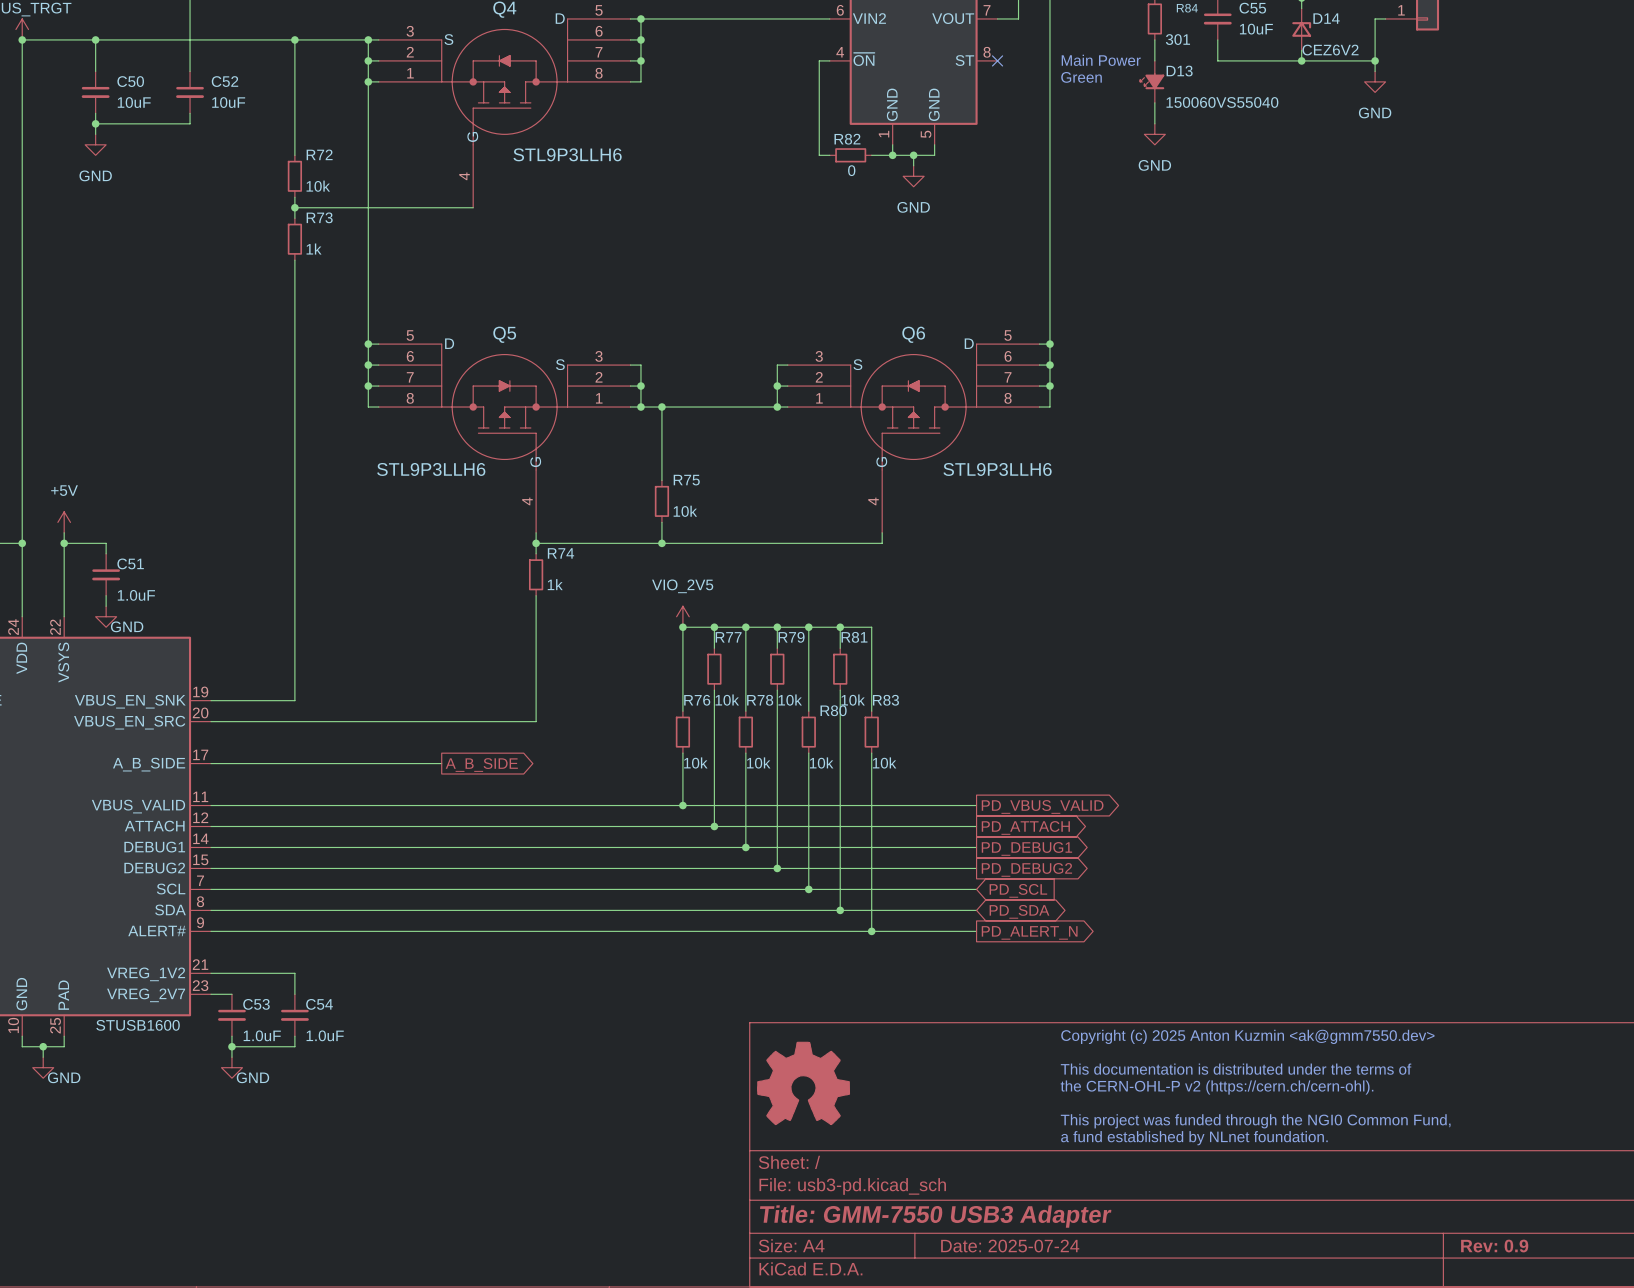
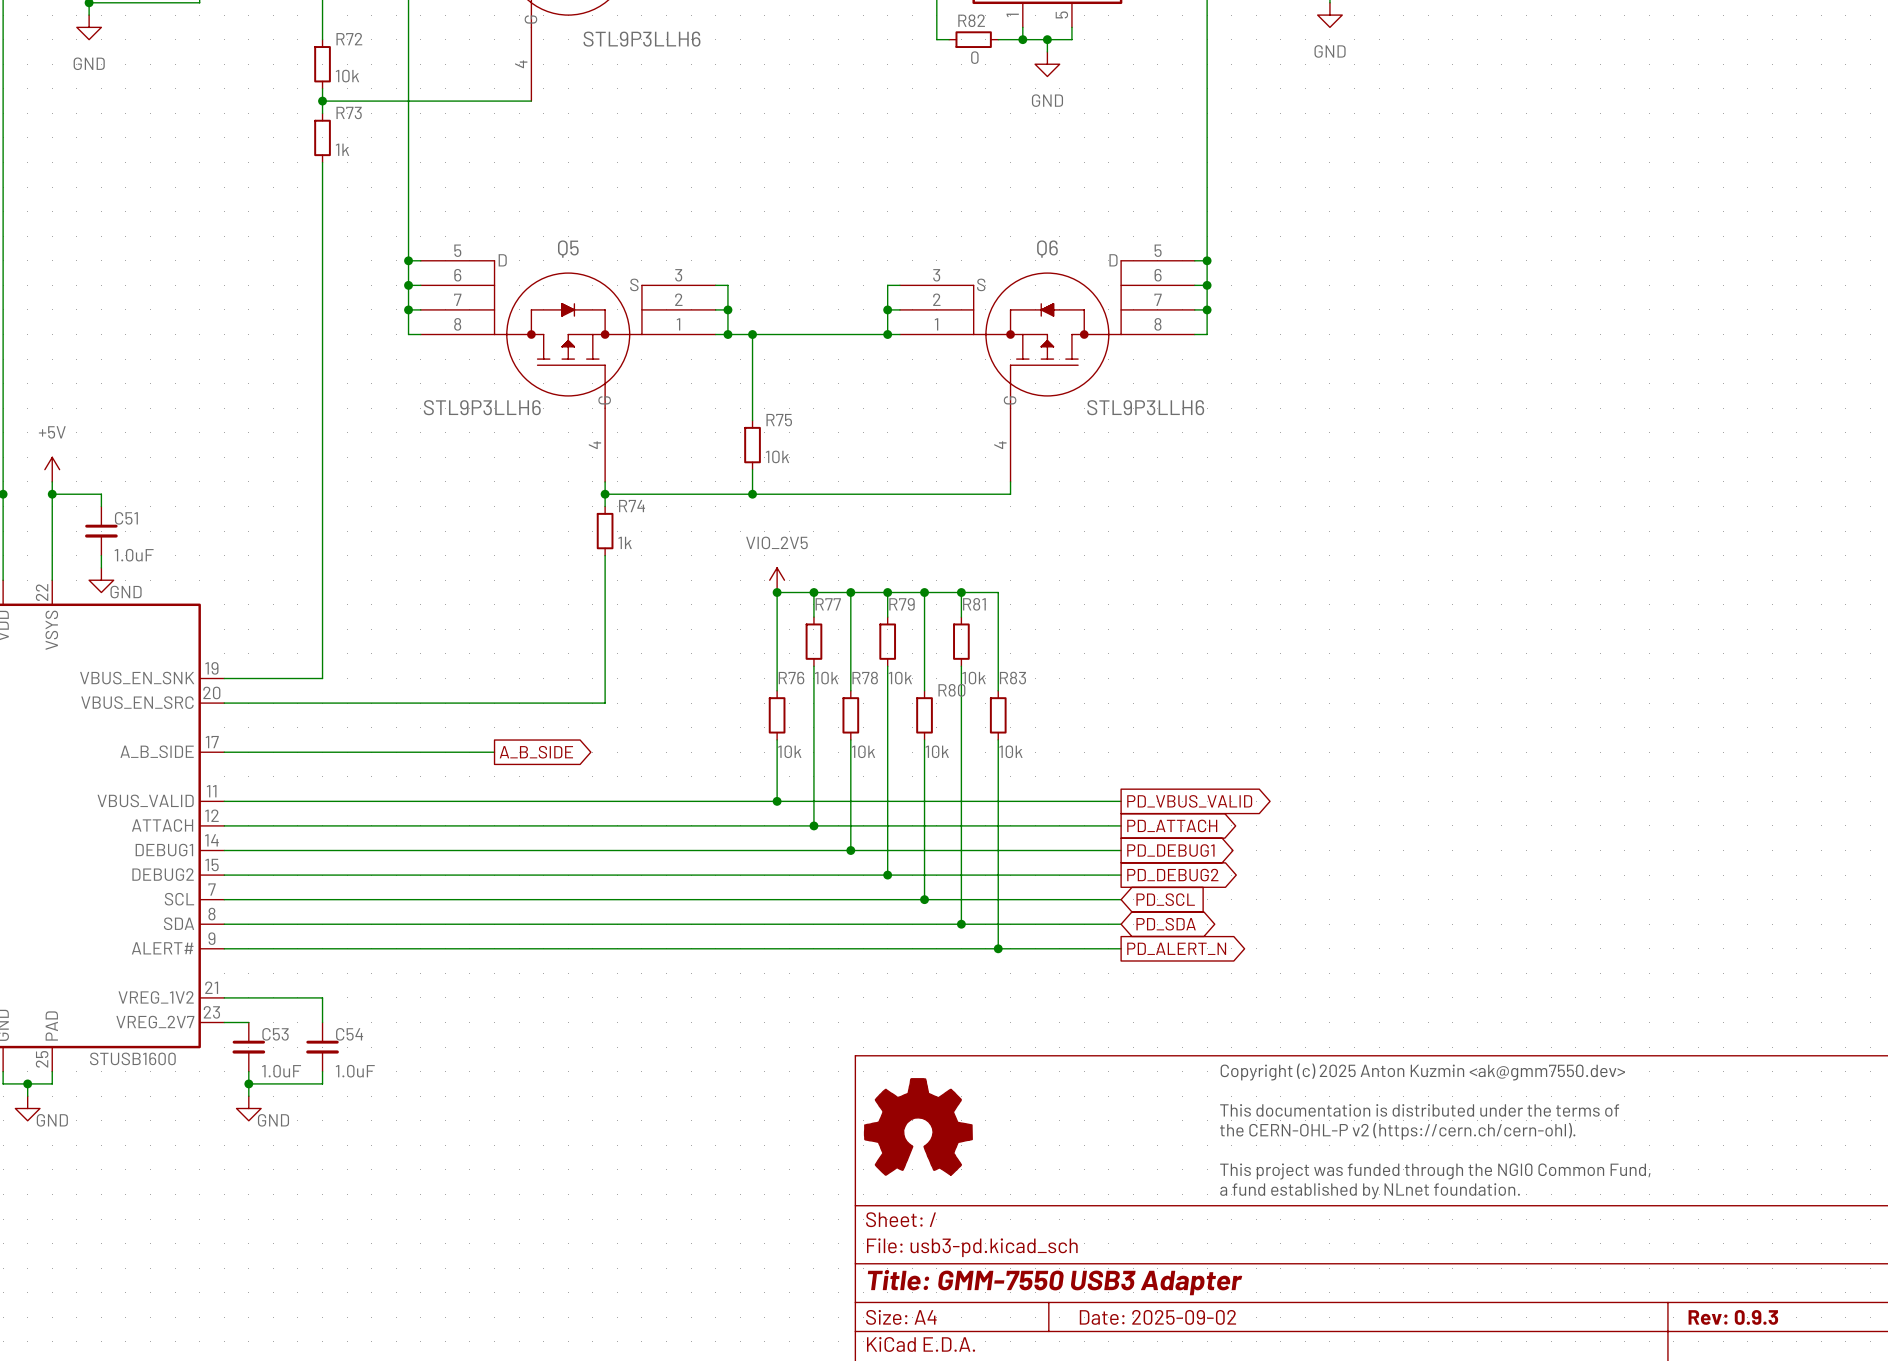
title block: Date: 2025-07-24 (1010, 1246) -> Date: 2025-09-02 (1157, 1317)
title block: Rev: 0.9 (1494, 1246) -> Rev: 0.9.3 (1733, 1317)

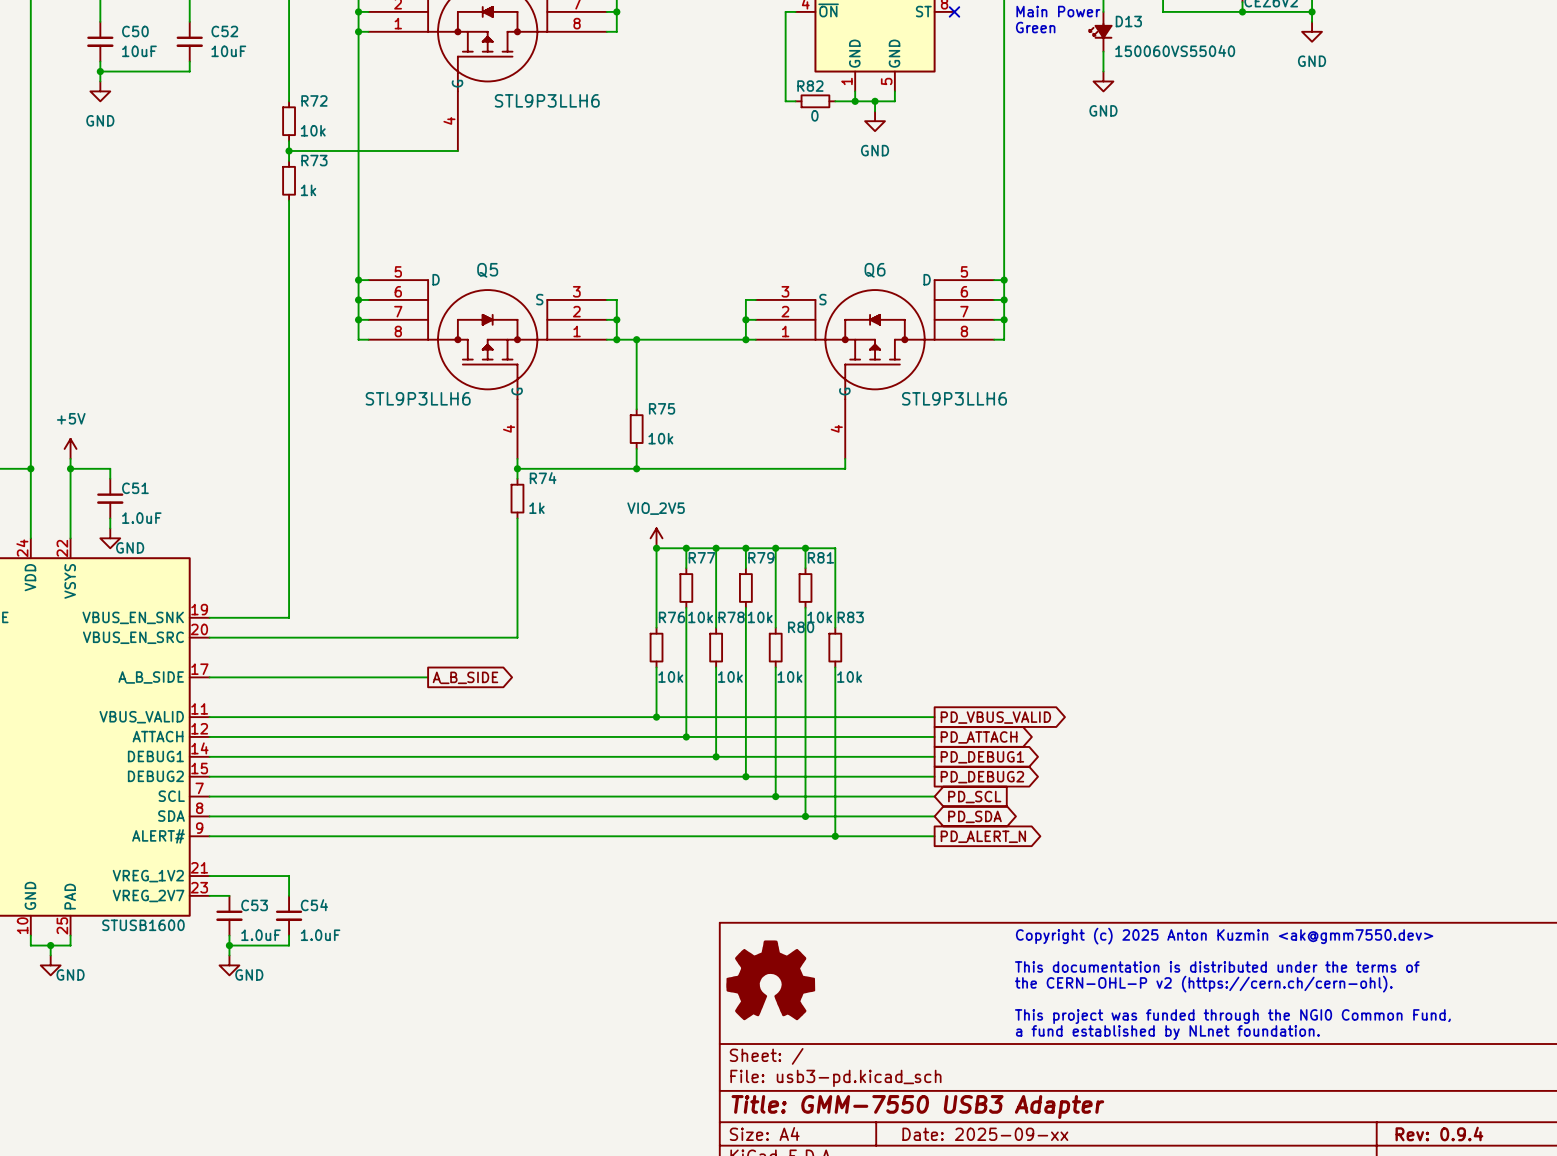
title block: Date: 2025-09-02 (1157, 1317) -> Date: 2025-09-xx (985, 1134)
title block: Rev: 0.9.3 (1733, 1317) -> Rev: 0.9.4 (1439, 1134)

